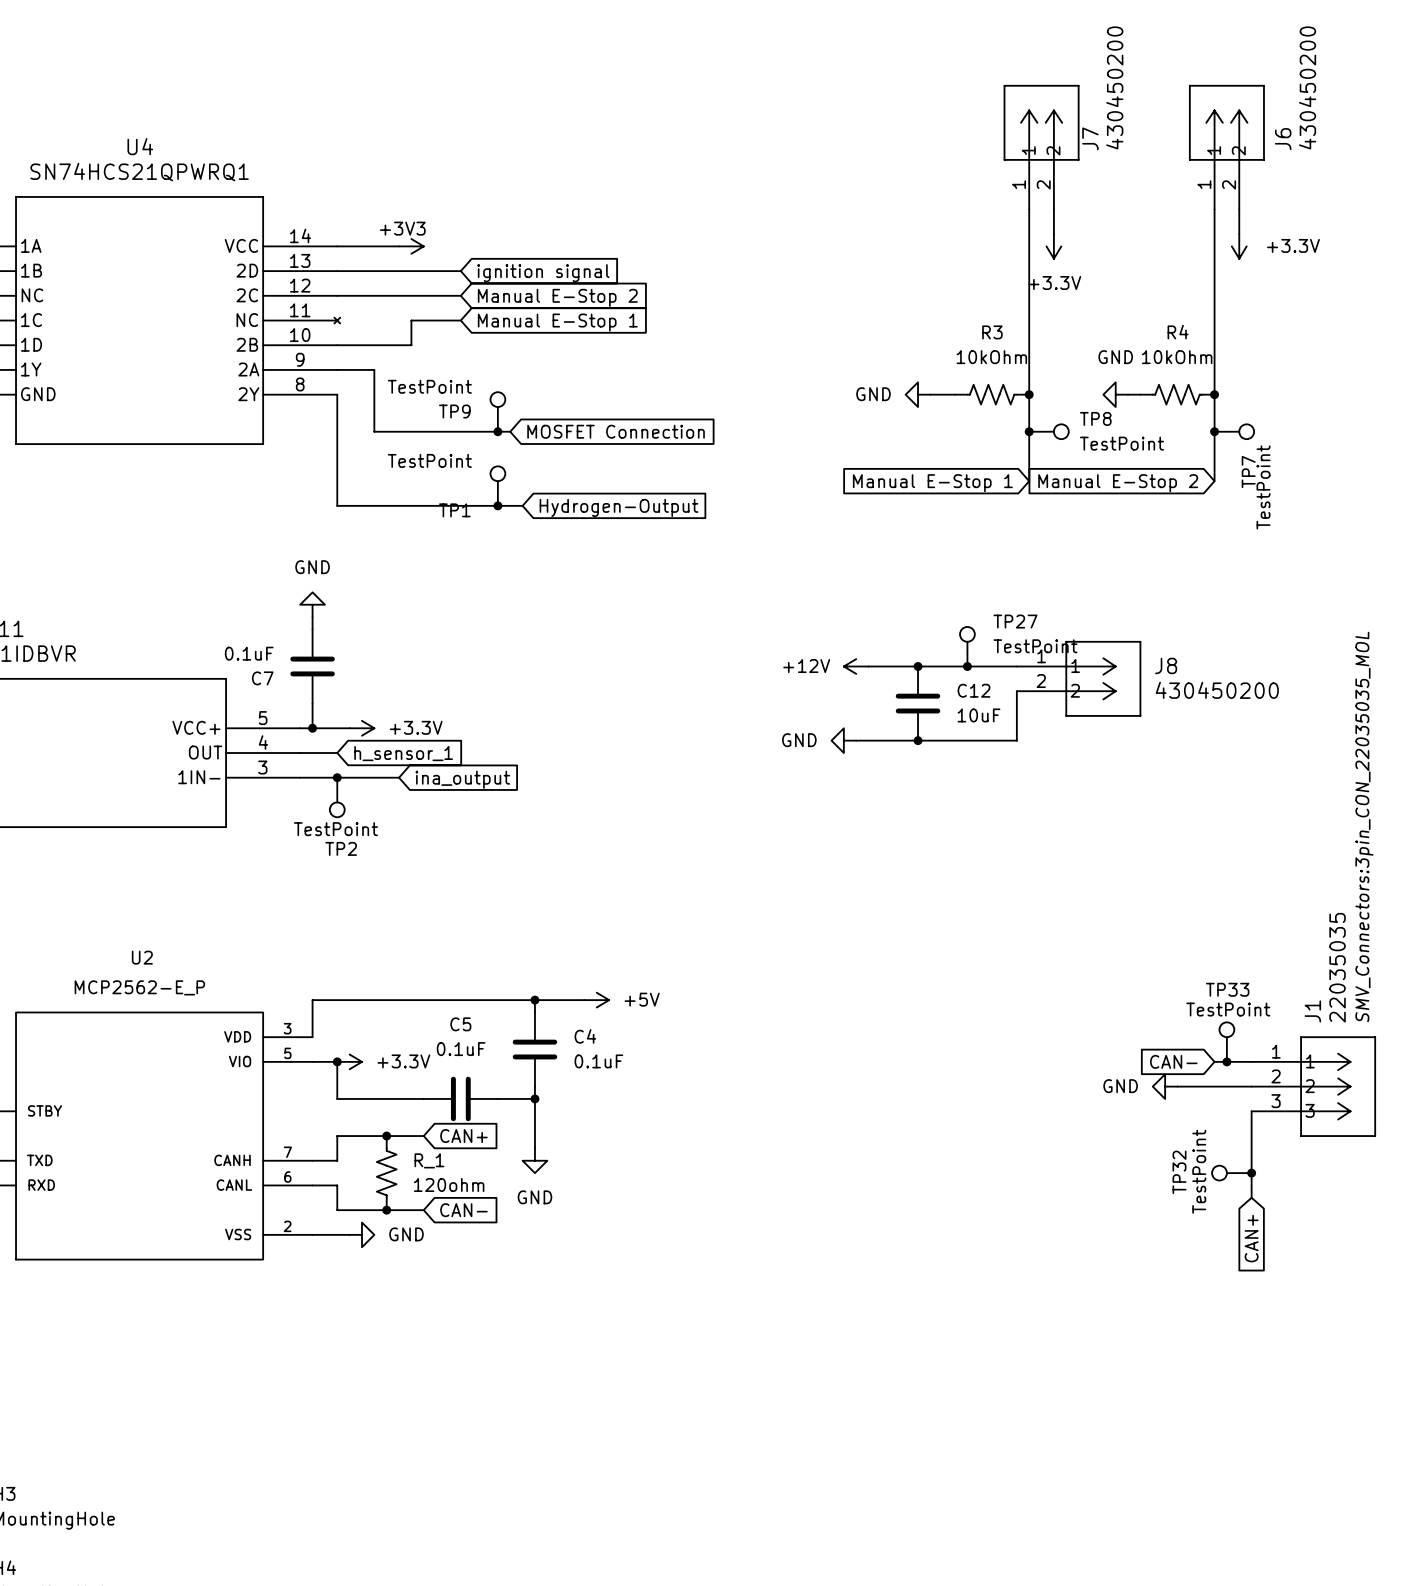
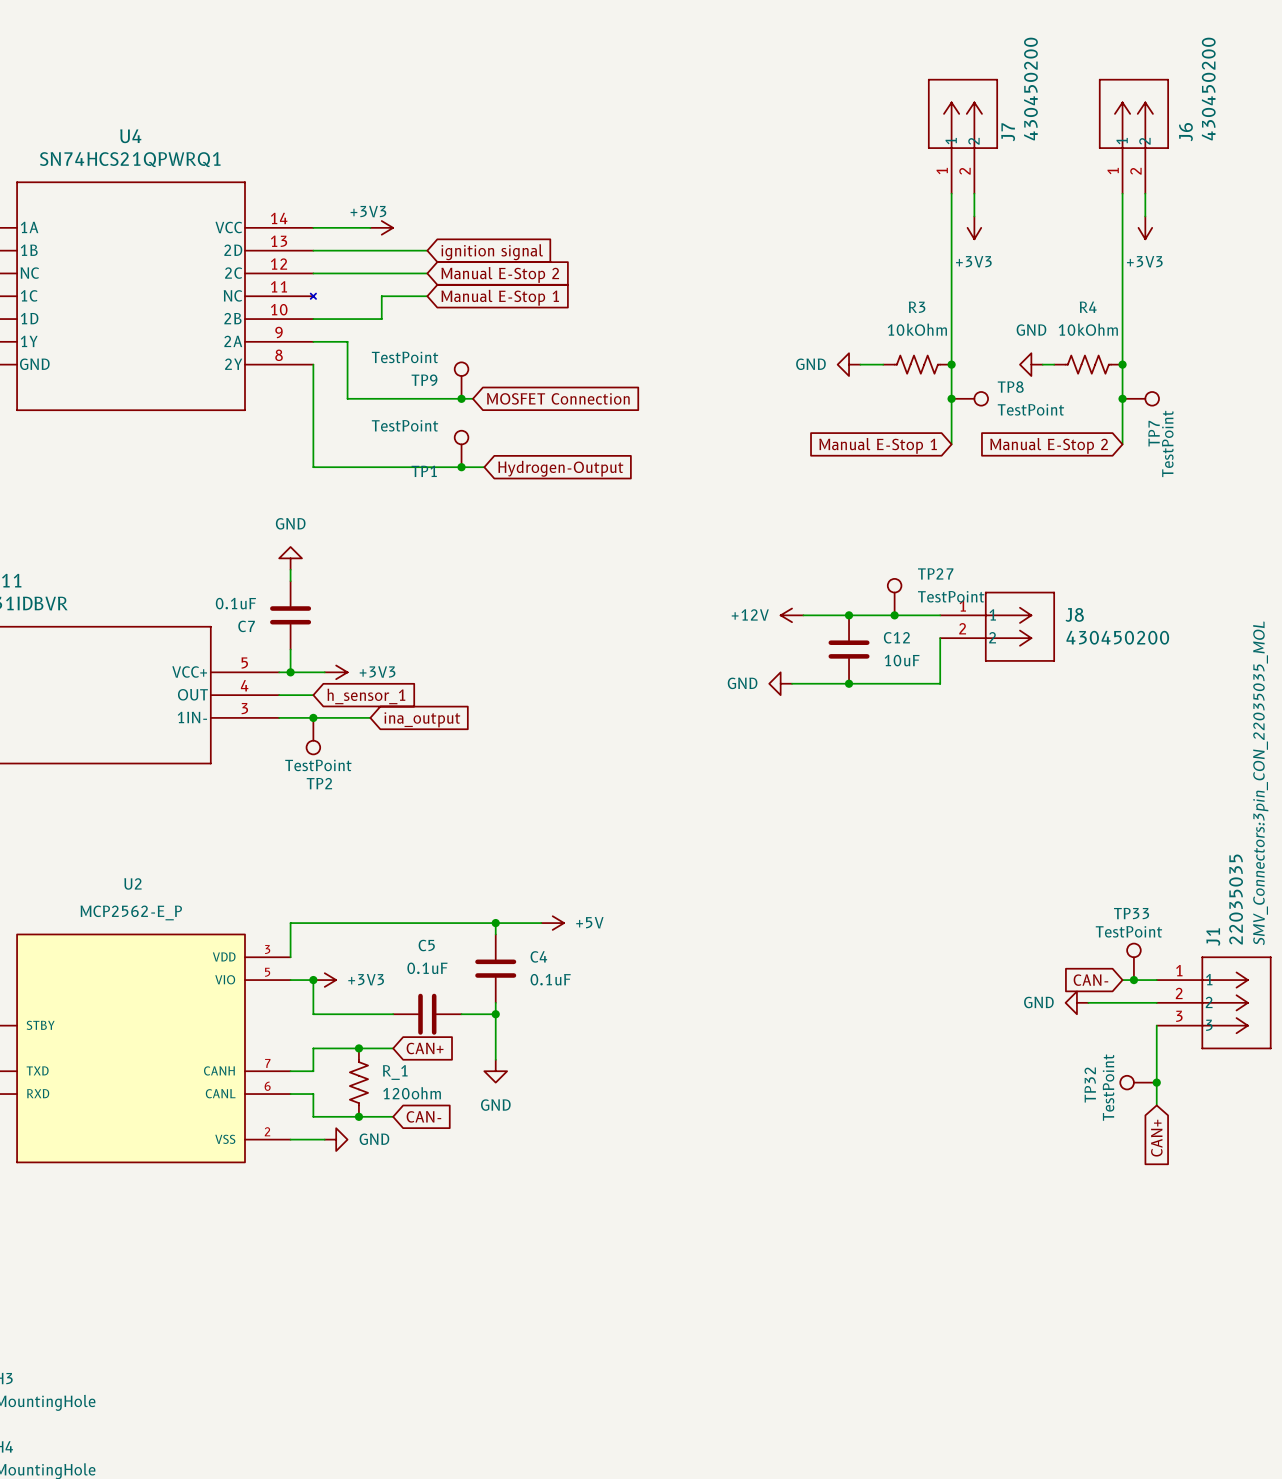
power symbol: +3.3V (1053, 246) -> +3V3 (974, 227)
power symbol: +3.3V (1239, 246) -> +3V3 (1145, 227)
power symbol: +3.3V (361, 728) -> +3V3 (336, 672)
power symbol: +3.3V (349, 1061) -> +3V3 (324, 980)

